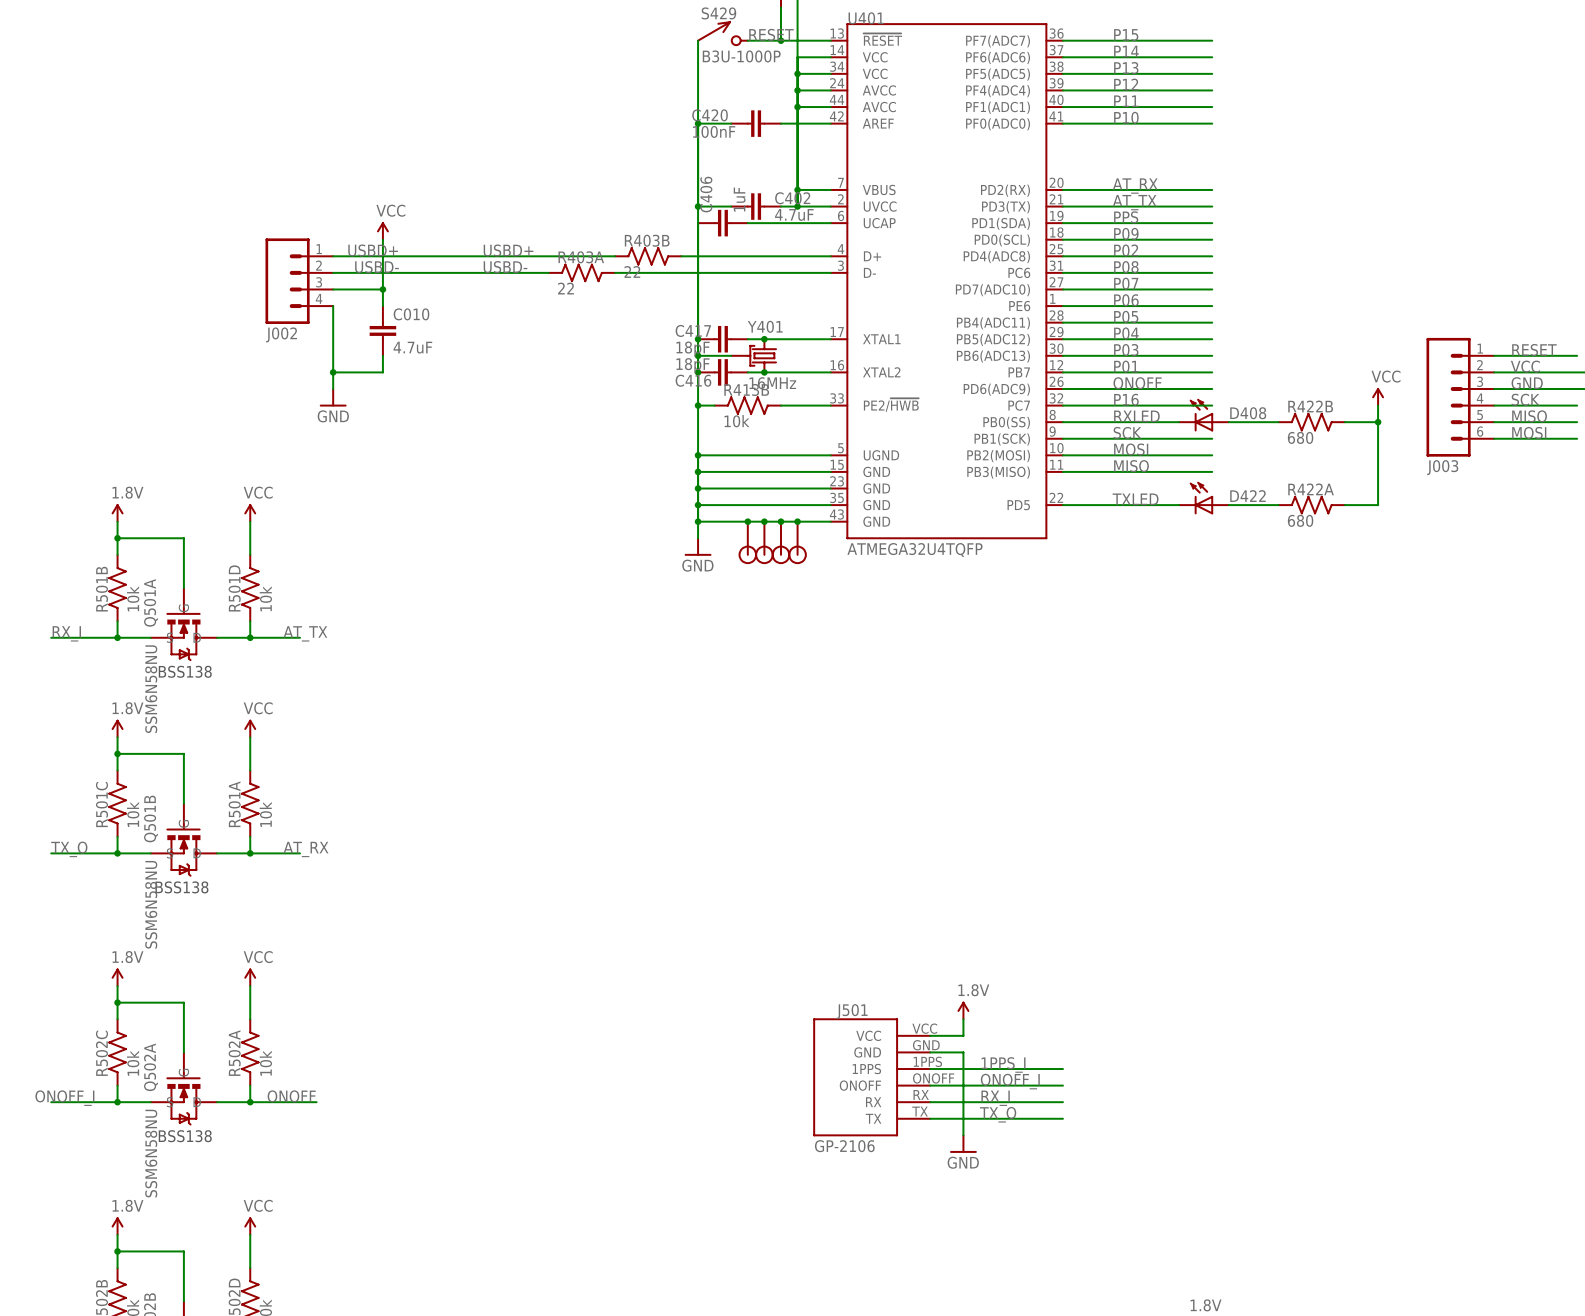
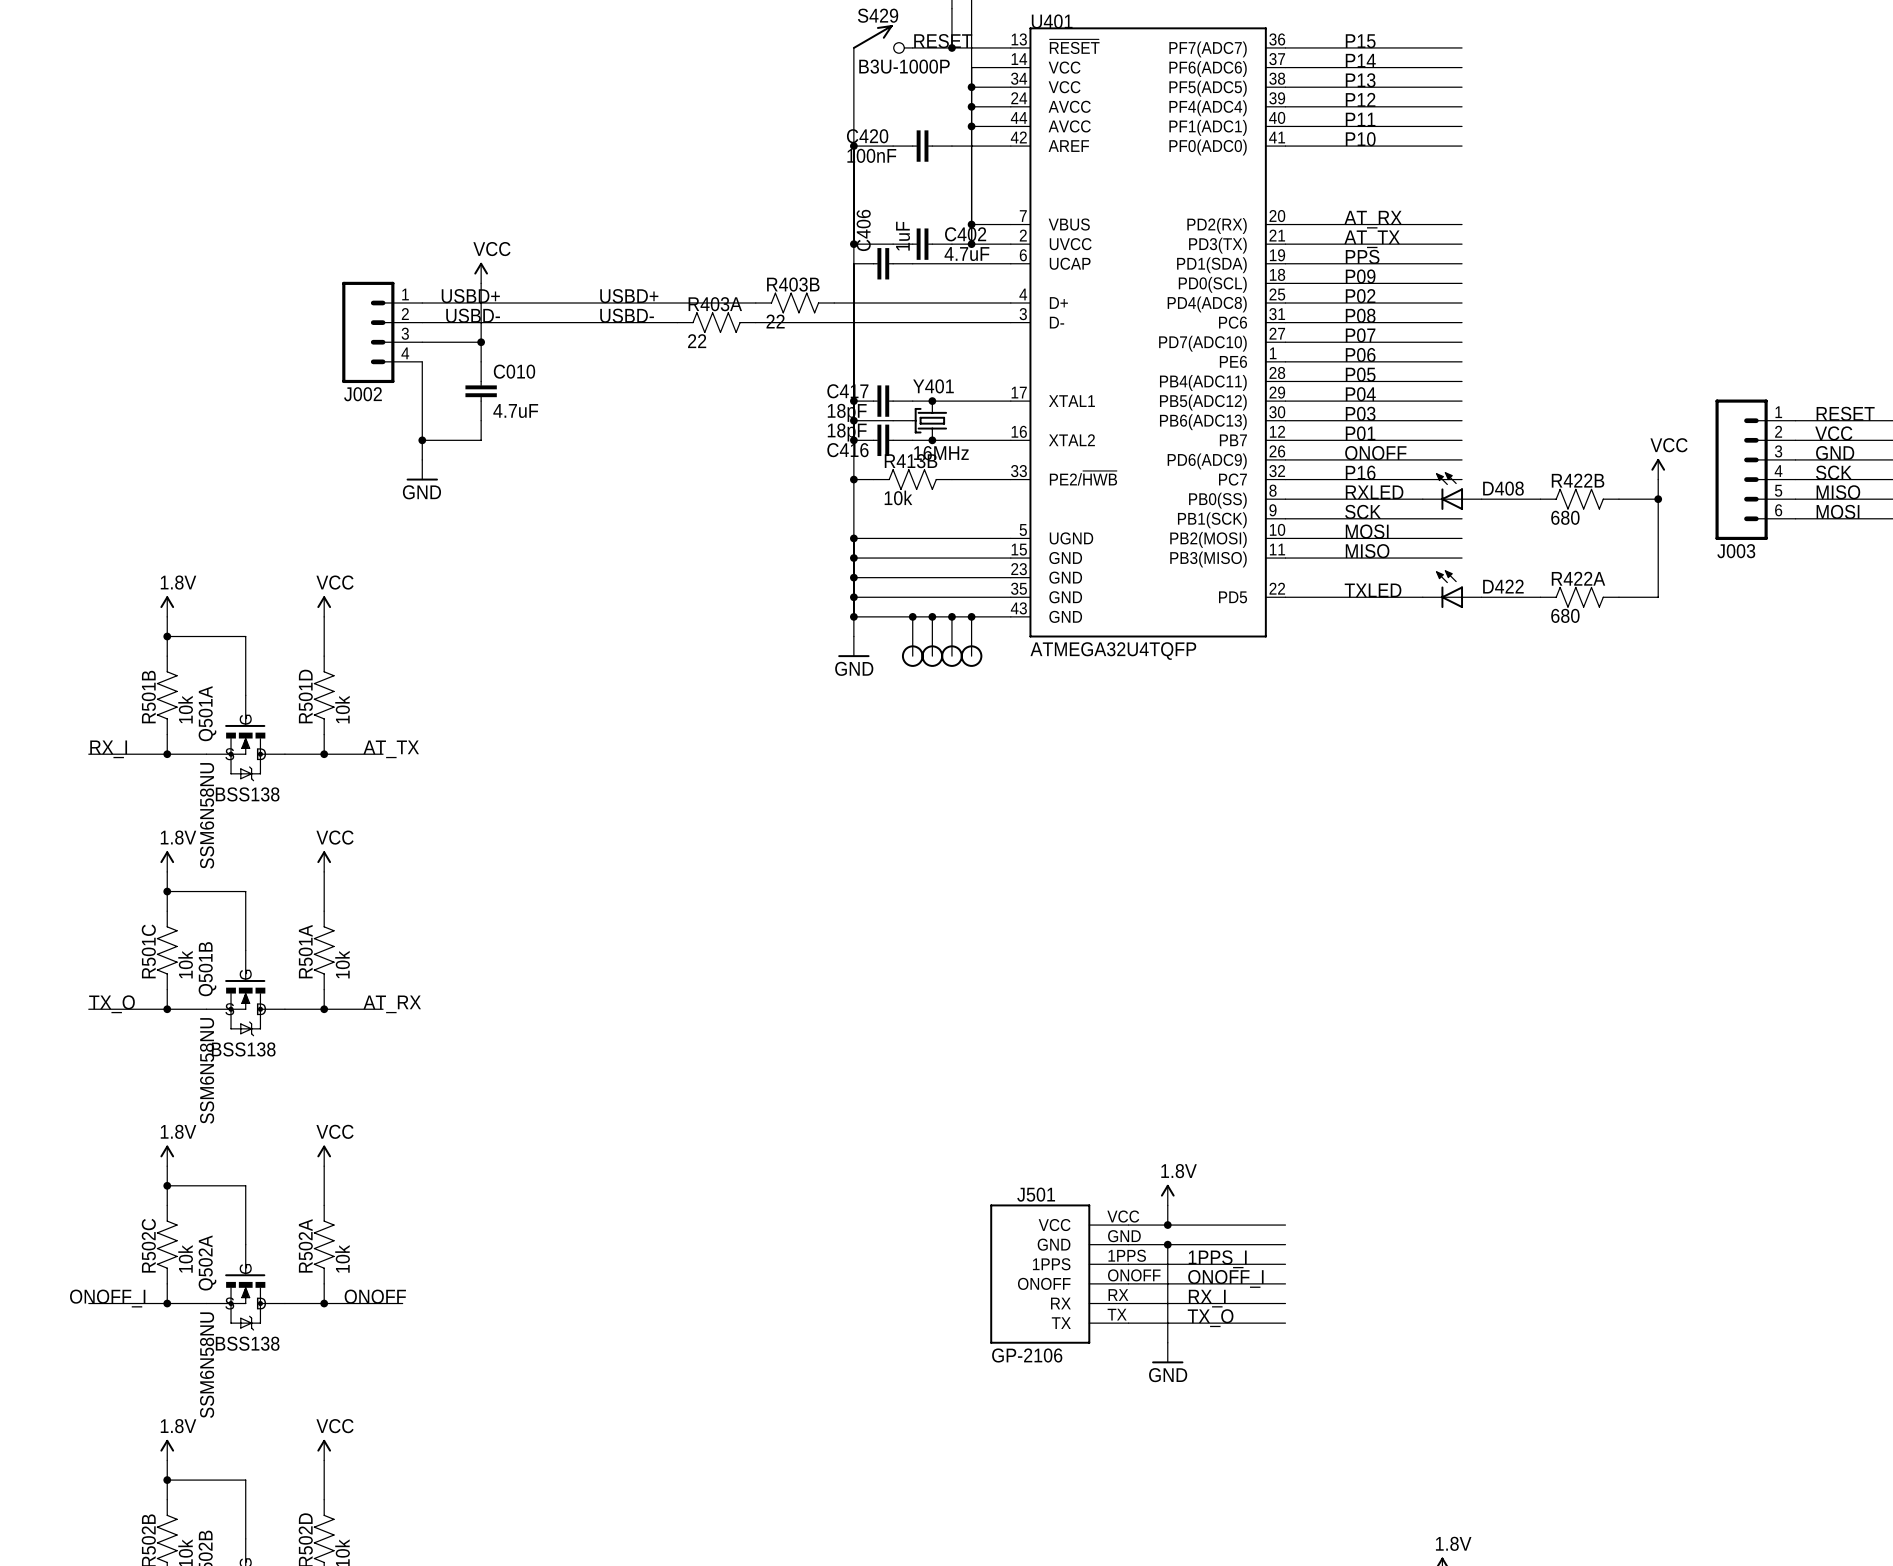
wire: none -> (1167, 1225) (1285, 1225)
junction: none -> (1167, 1225)
wire: none -> (1167, 1244) (1285, 1244)
junction: none -> (1167, 1244)

